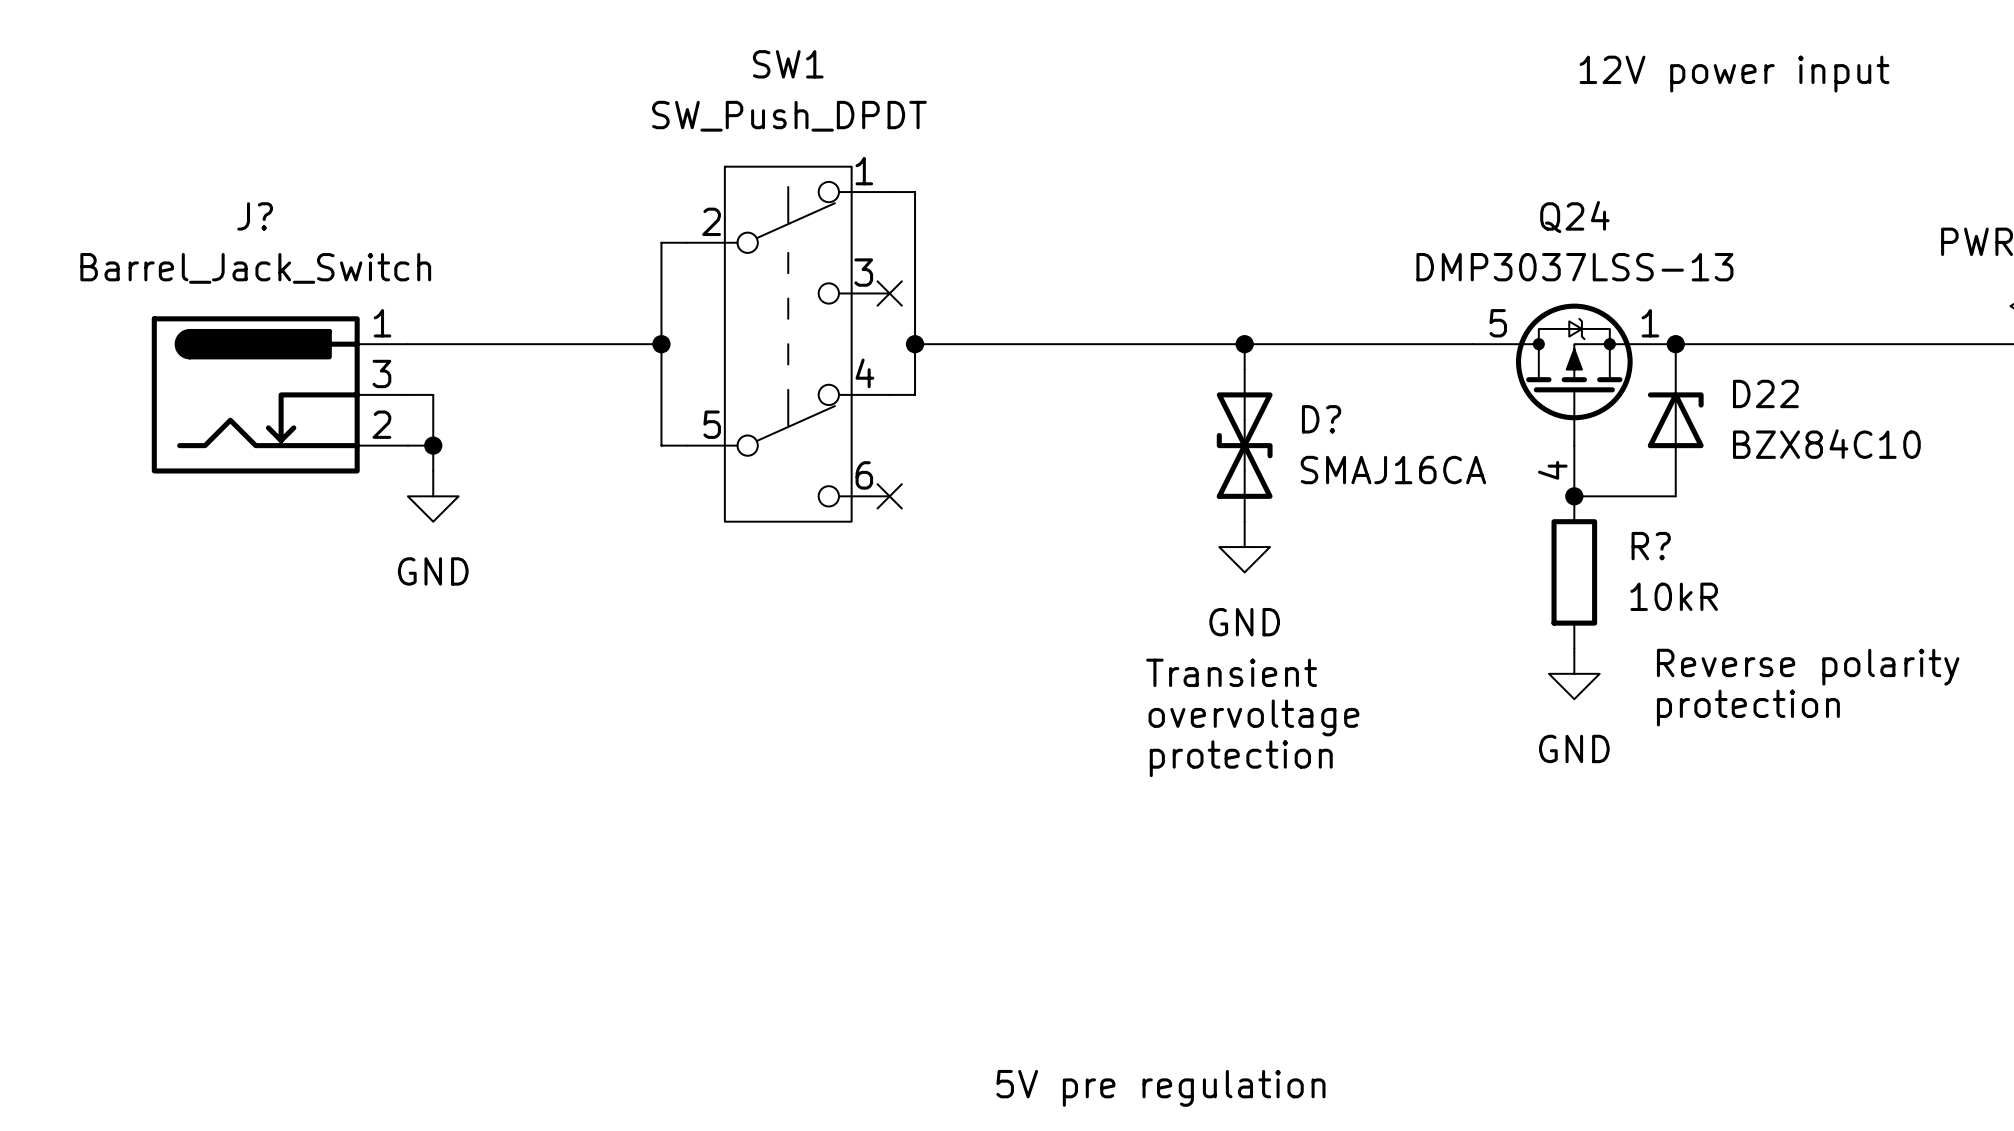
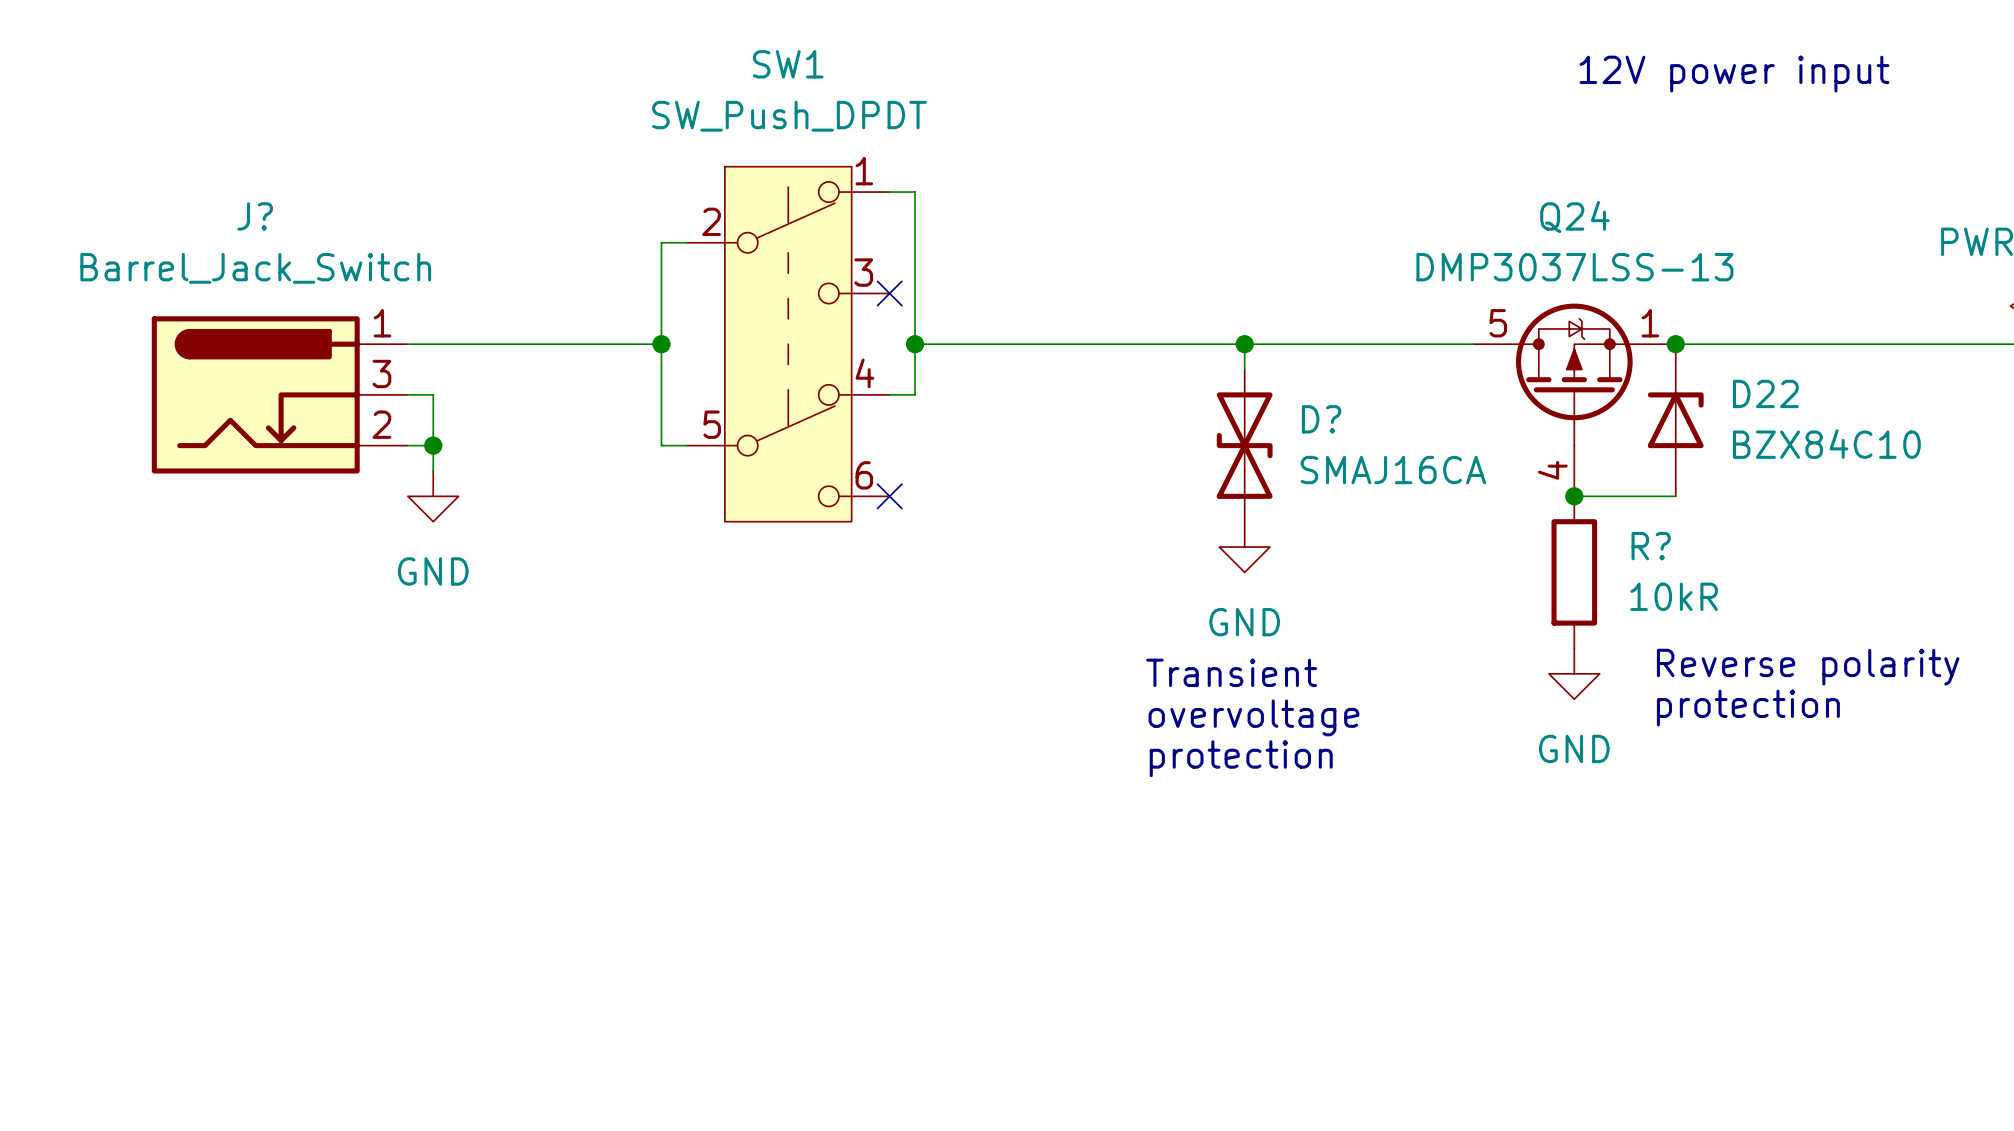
text: 5V pre regulation (1160, 1088) -> none

